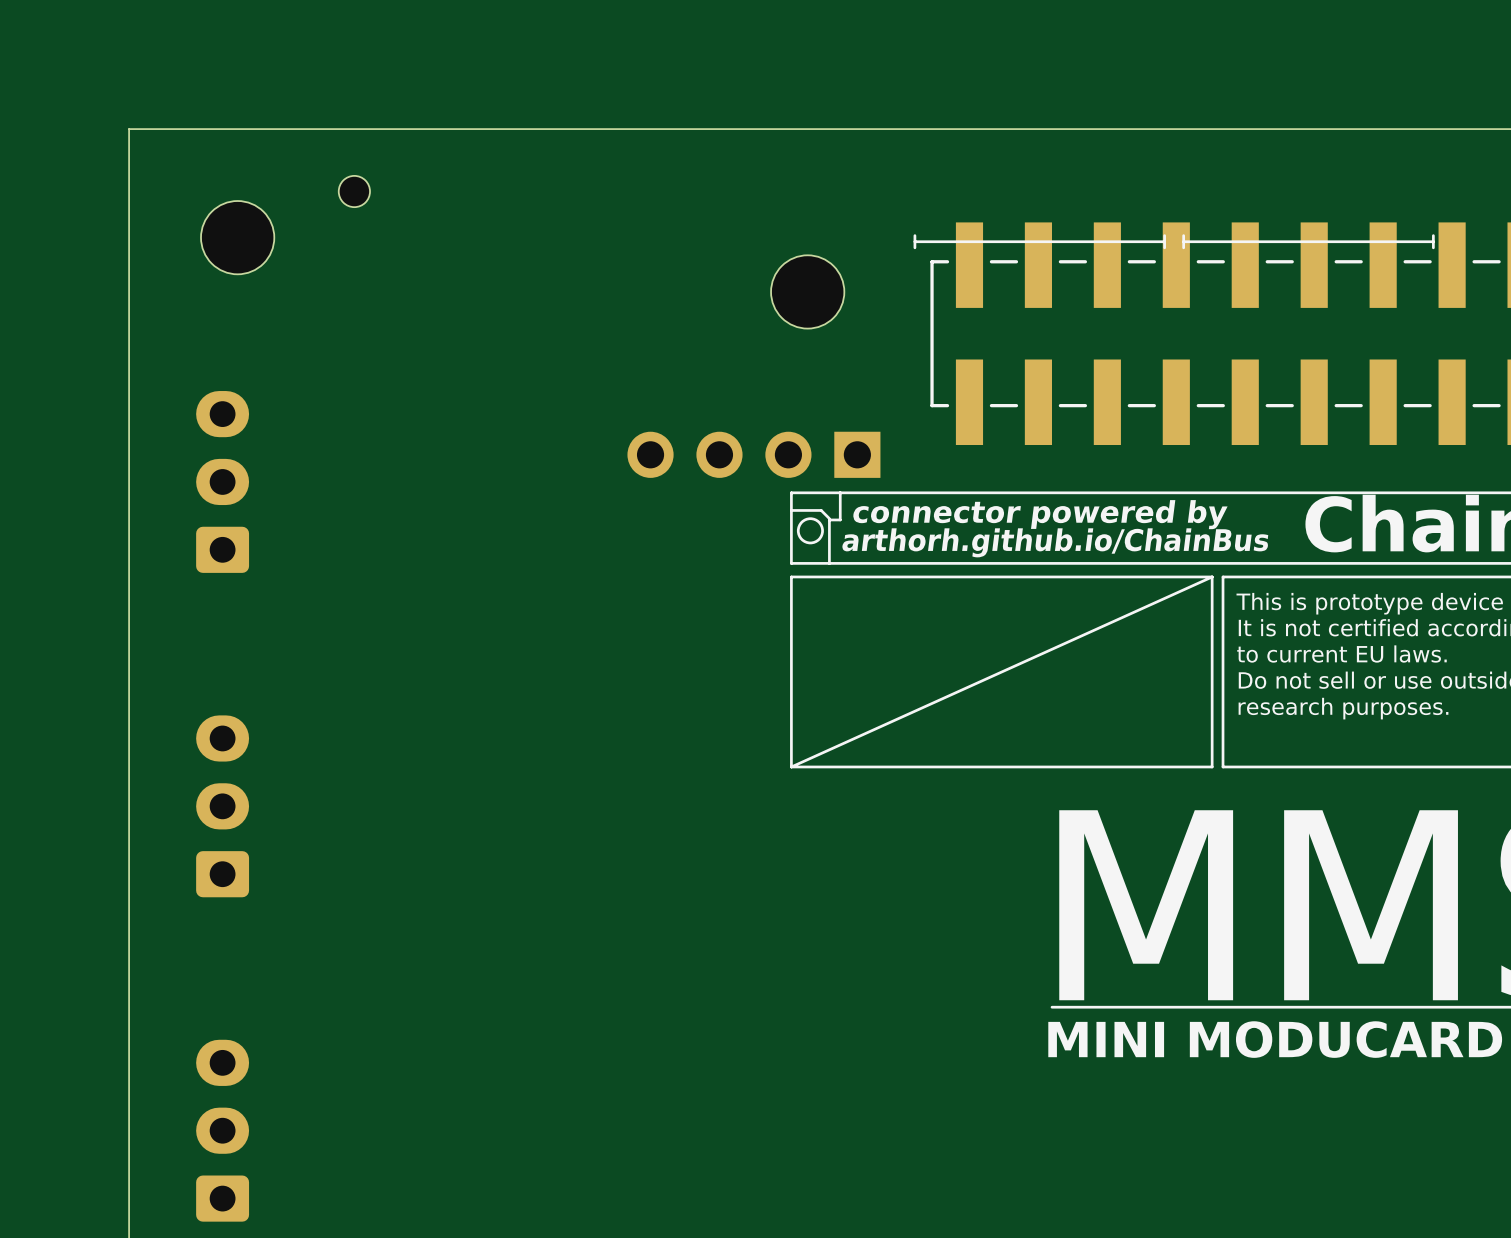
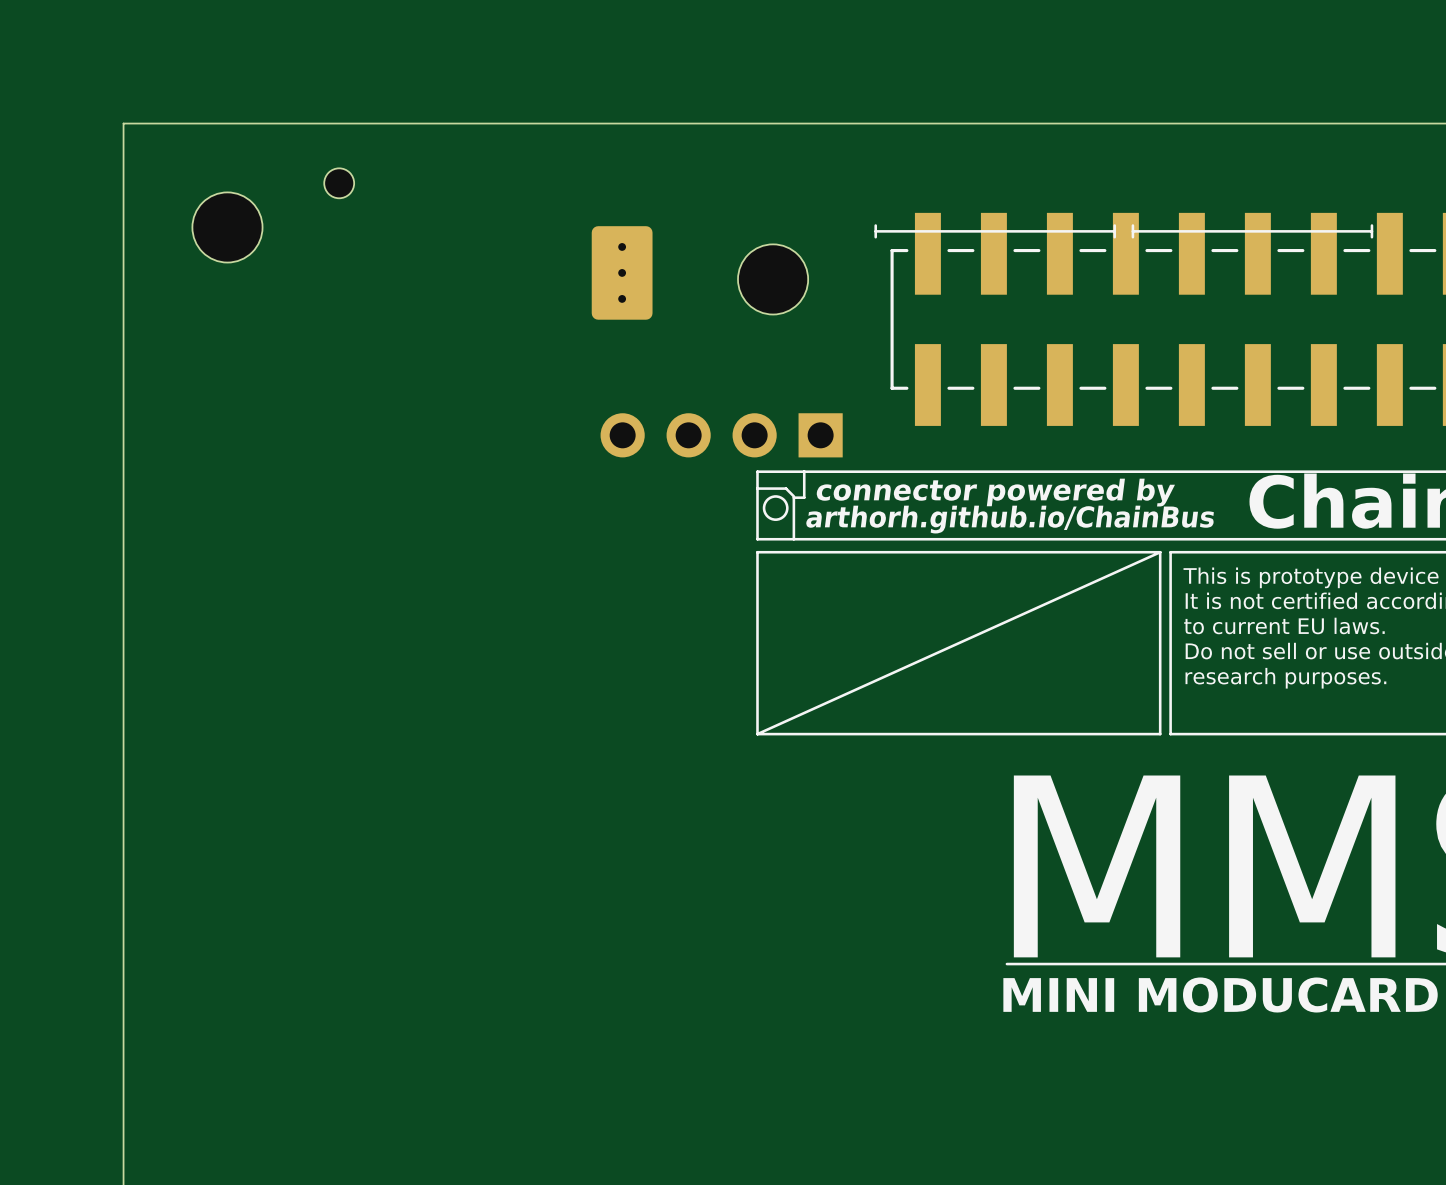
part: none -> (622, 272)
part: (222, 481) -> none
part: (222, 806) -> none
part: (222, 1130) -> none

